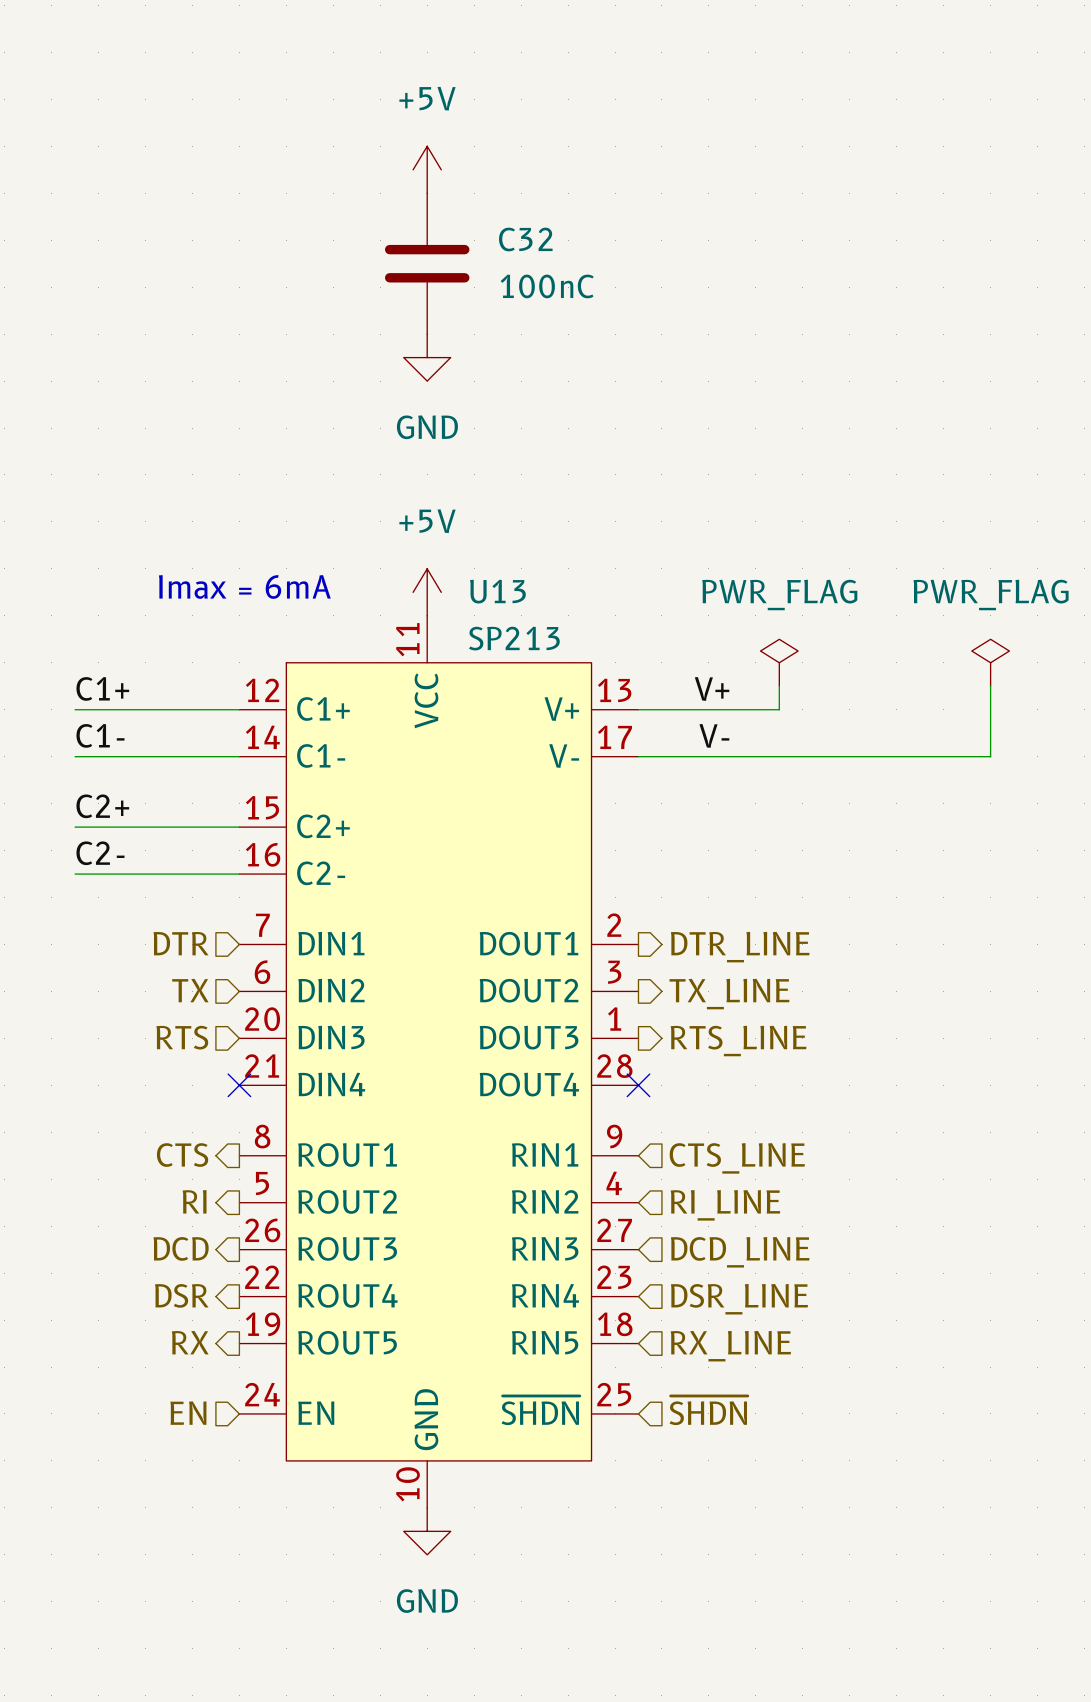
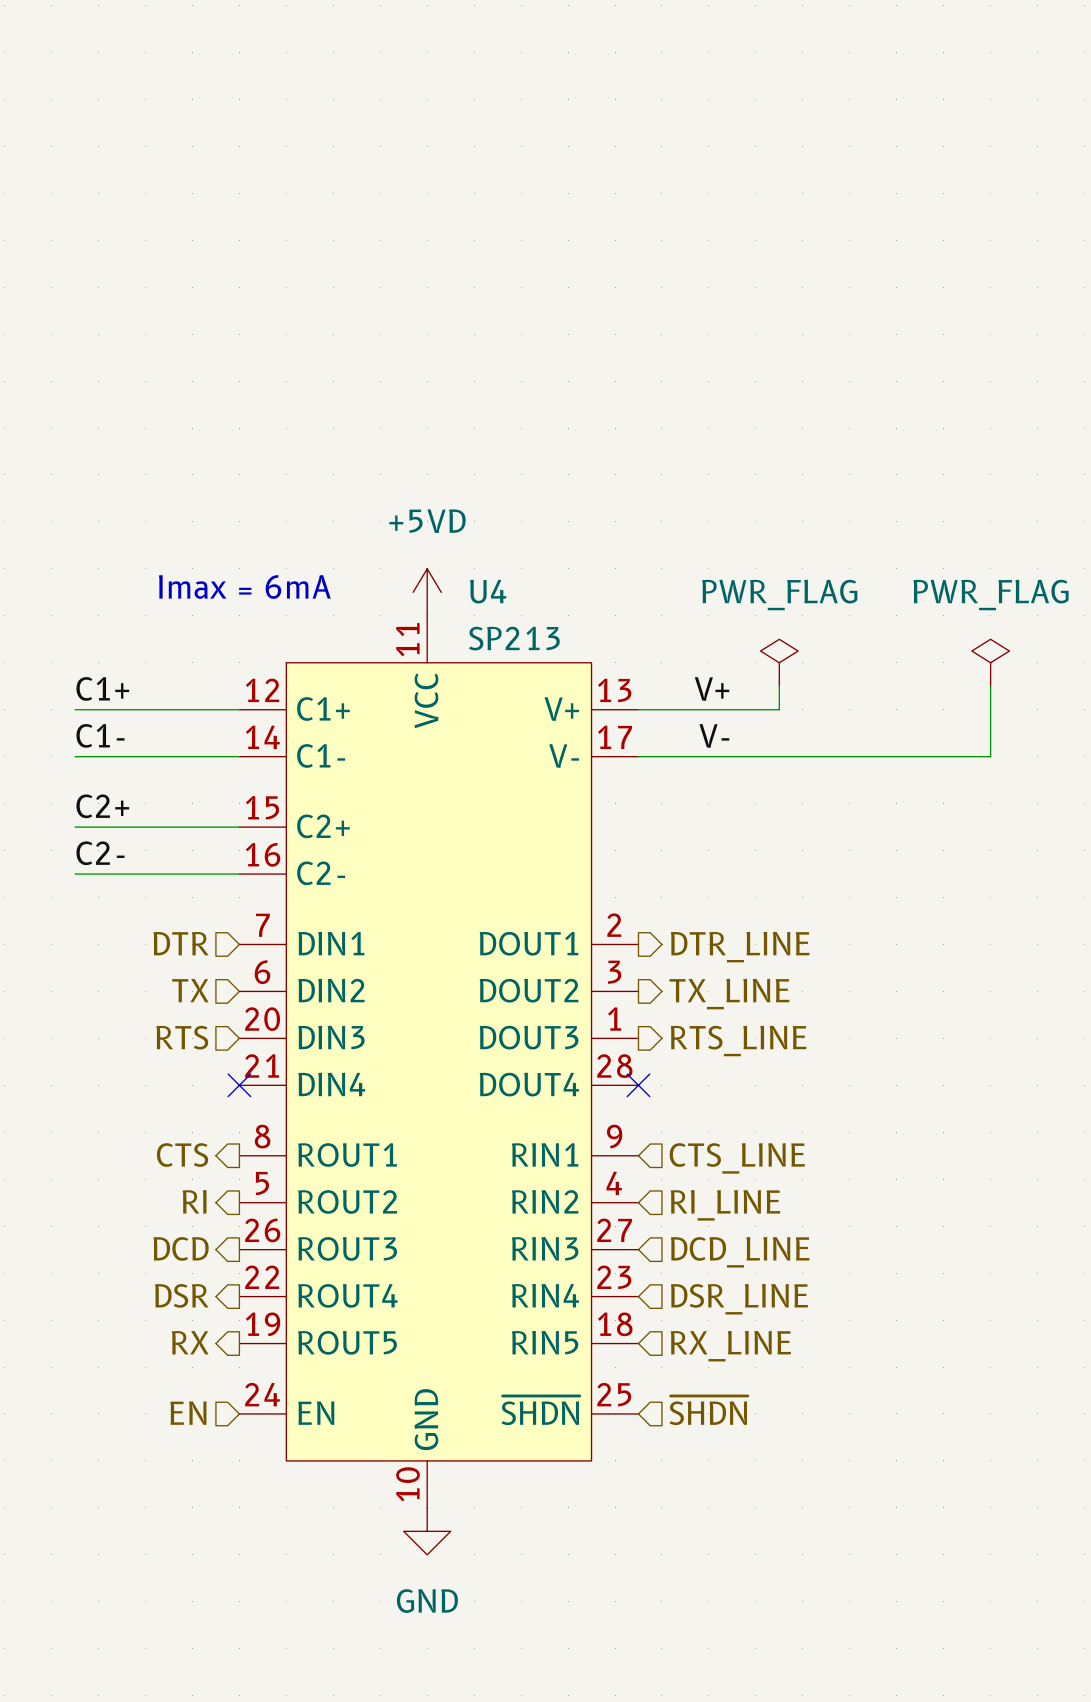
power symbol: +5V (427, 169) -> none
C32: 100nC (427, 263) -> none
power symbol: GND (427, 357) -> none
U13 name: U13 (497, 591) -> U4 (488, 591)
power symbol: +5V (427, 592) -> +5VD (427, 592)

